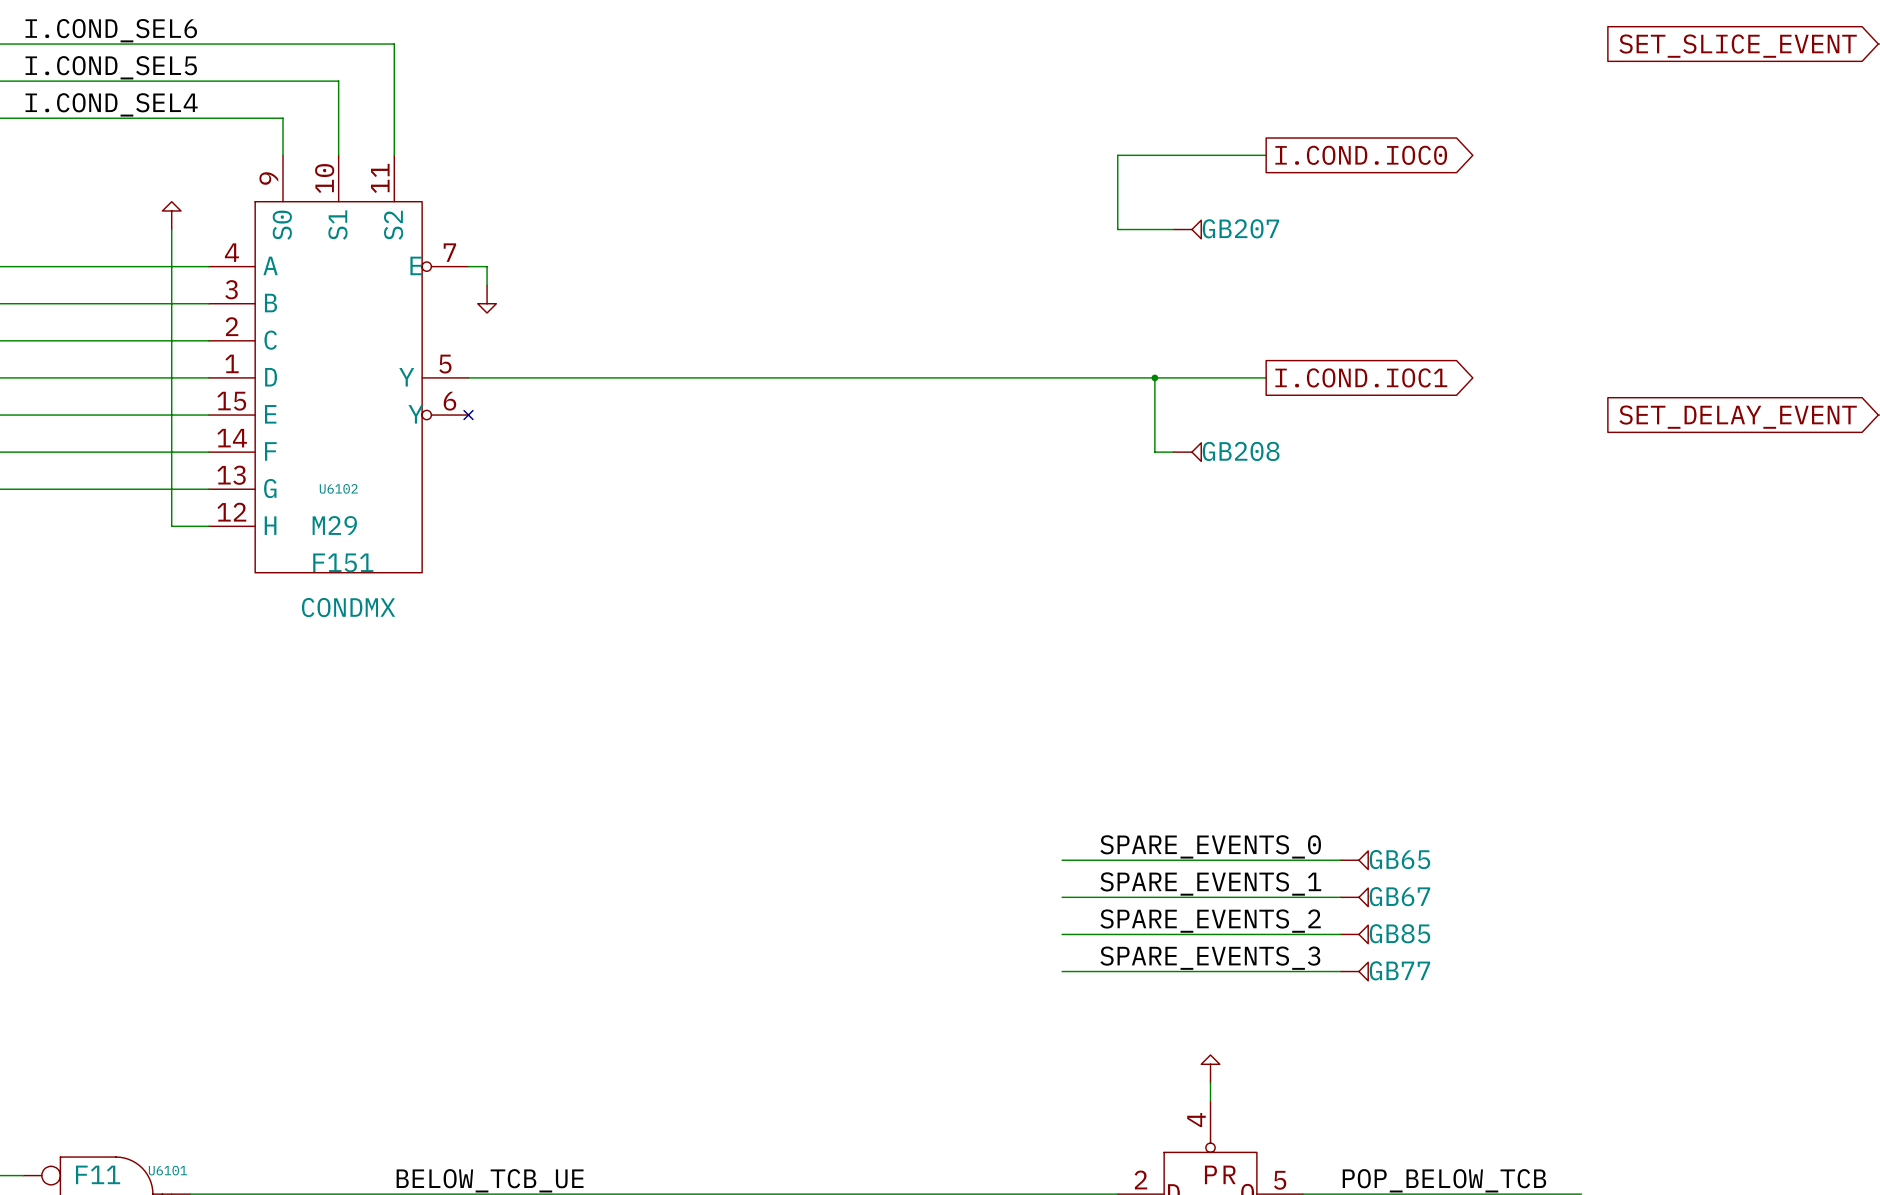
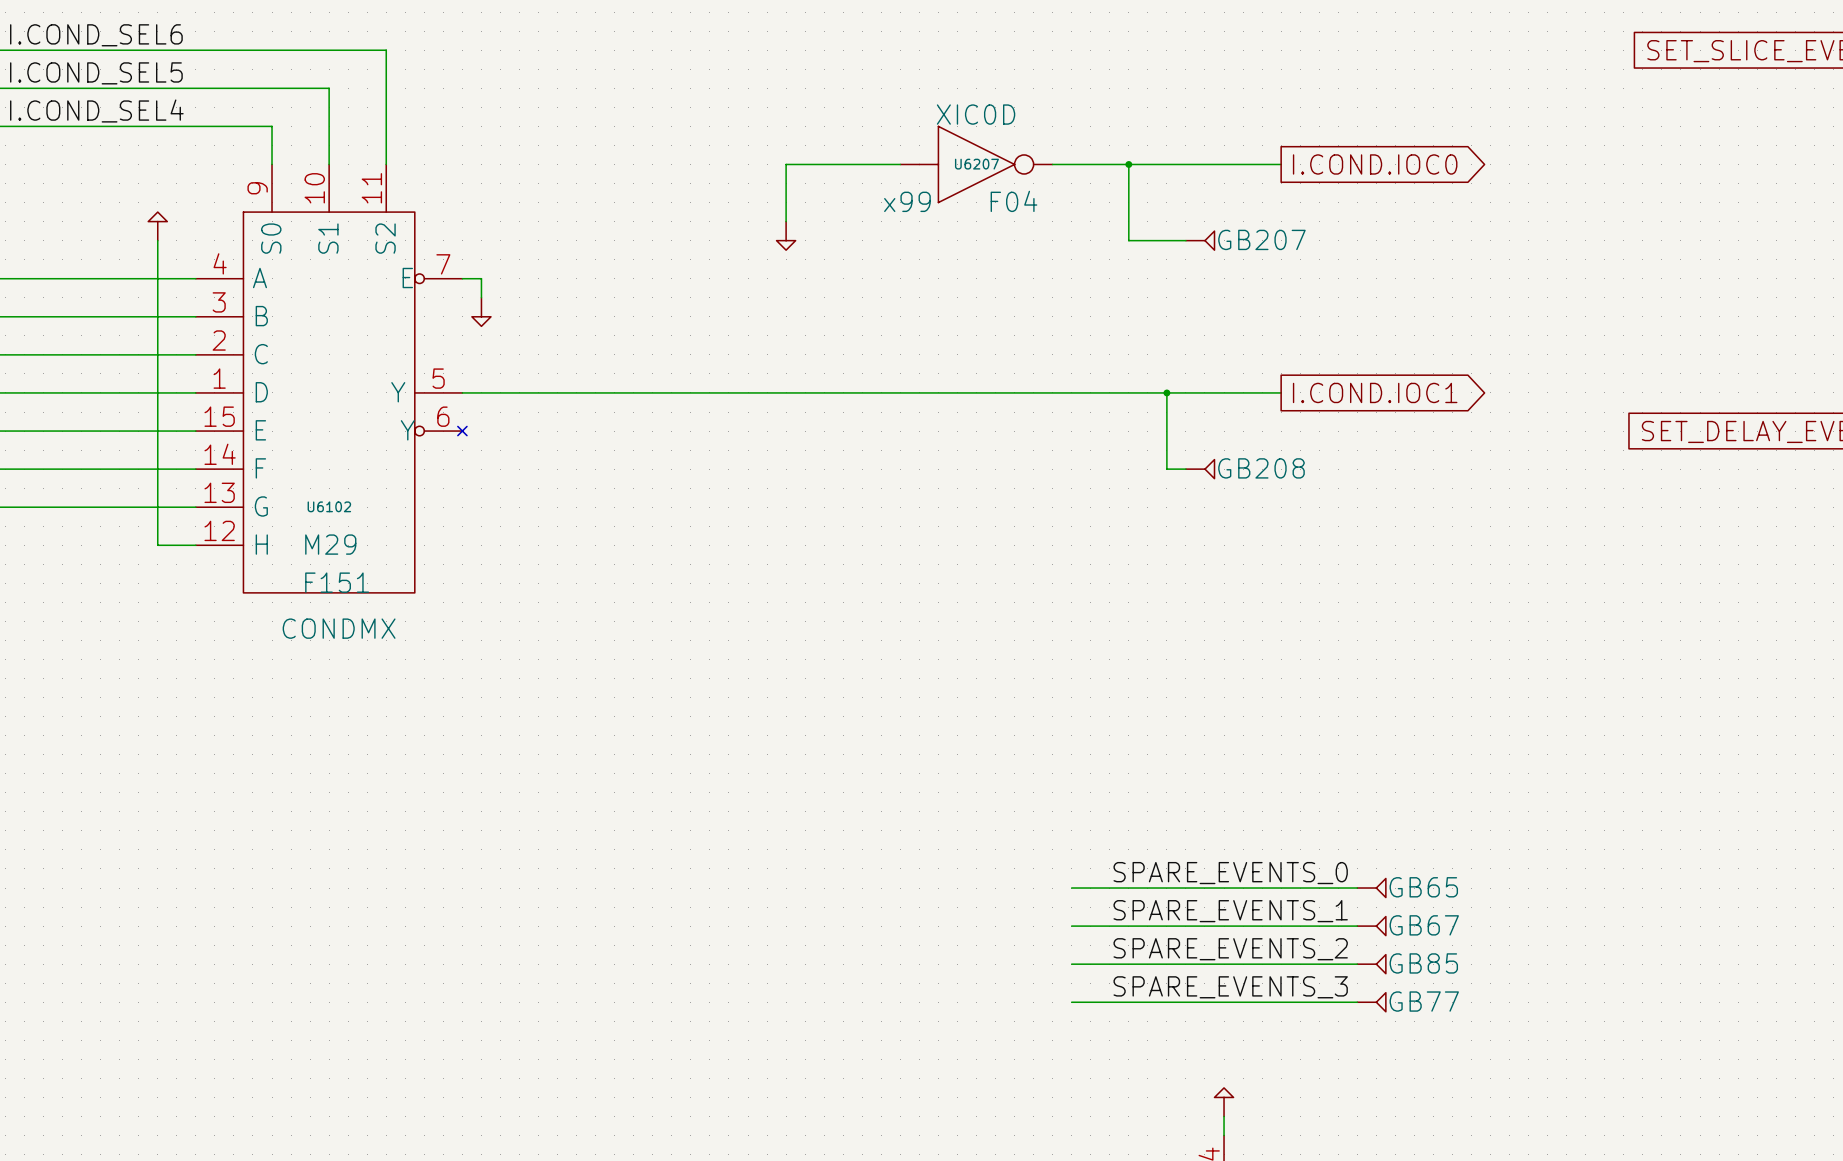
wire: none -> (900, 164) (786, 164) (786, 221)
U6207: none -> F04 (976, 164)
wire: none -> (1052, 164) (1128, 164)
junction: none -> (1128, 164)
power symbol: none -> (786, 236)

